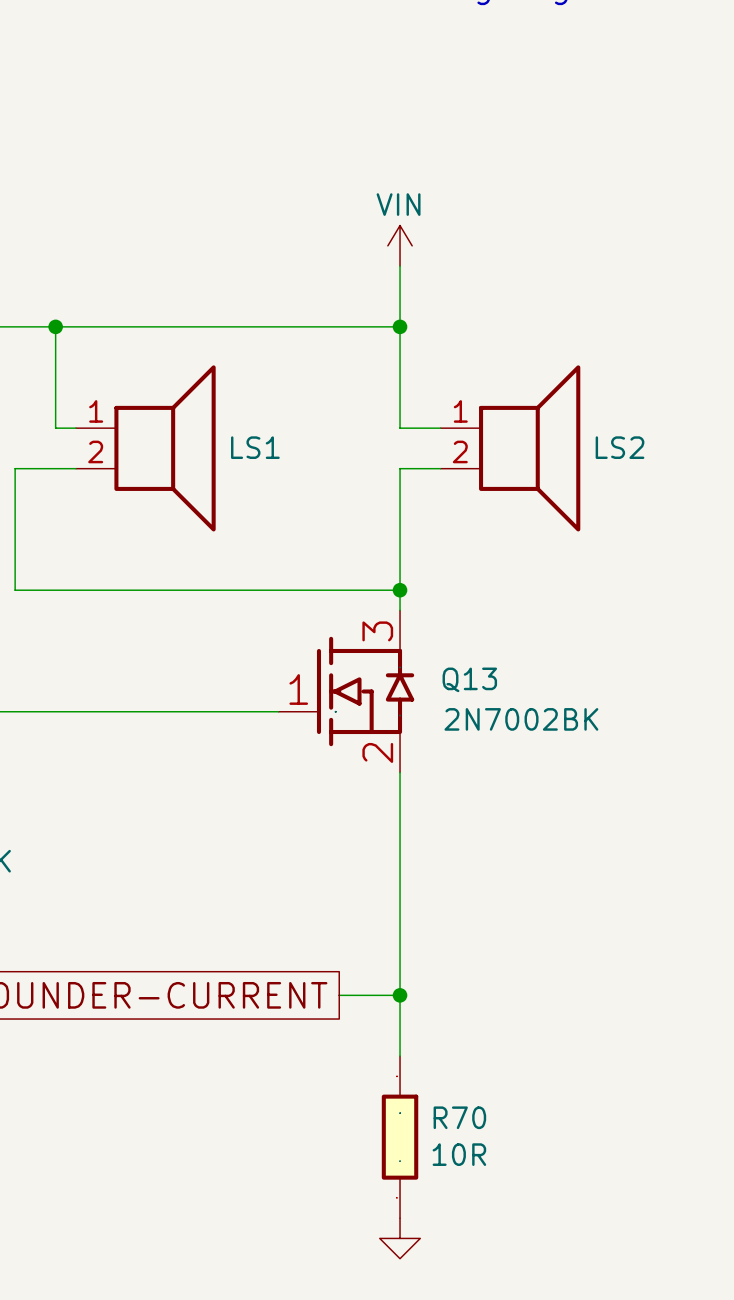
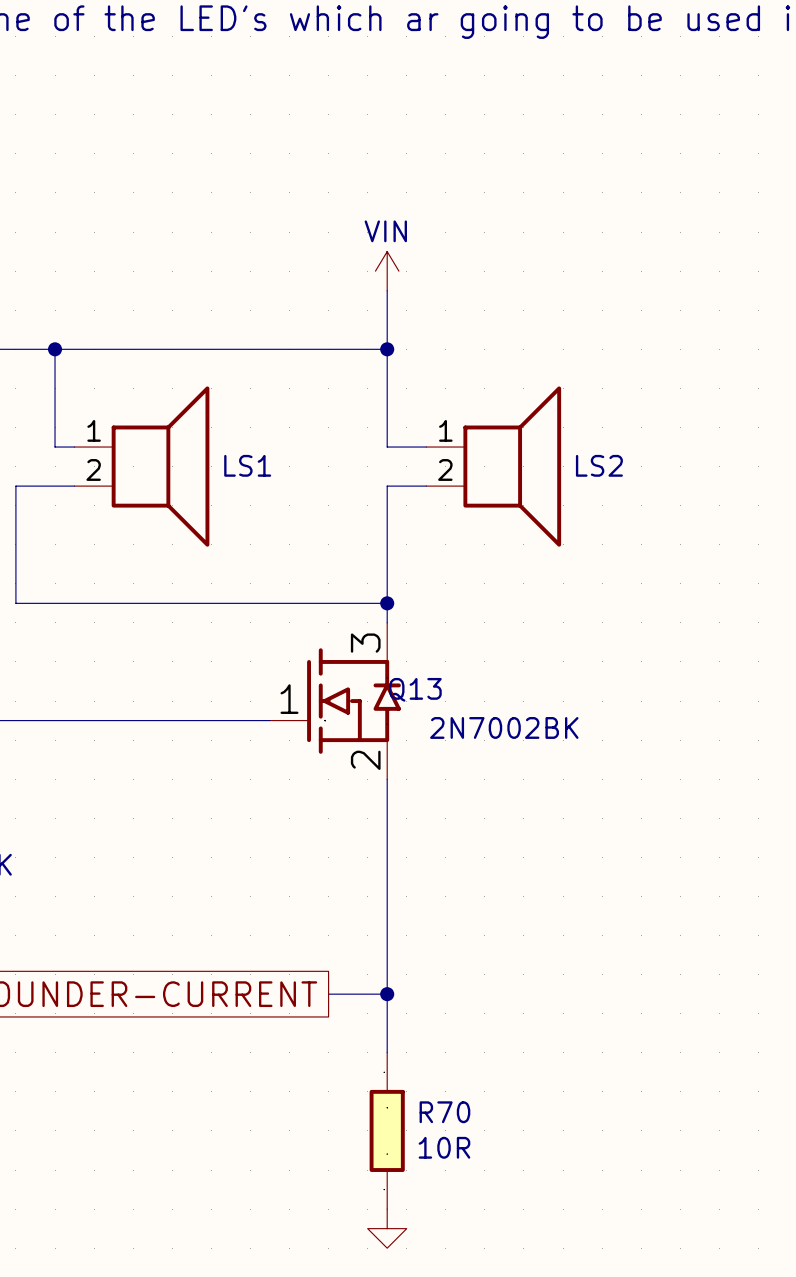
Q13 name position: Q13 (469, 679) -> Q13 (415, 689)

